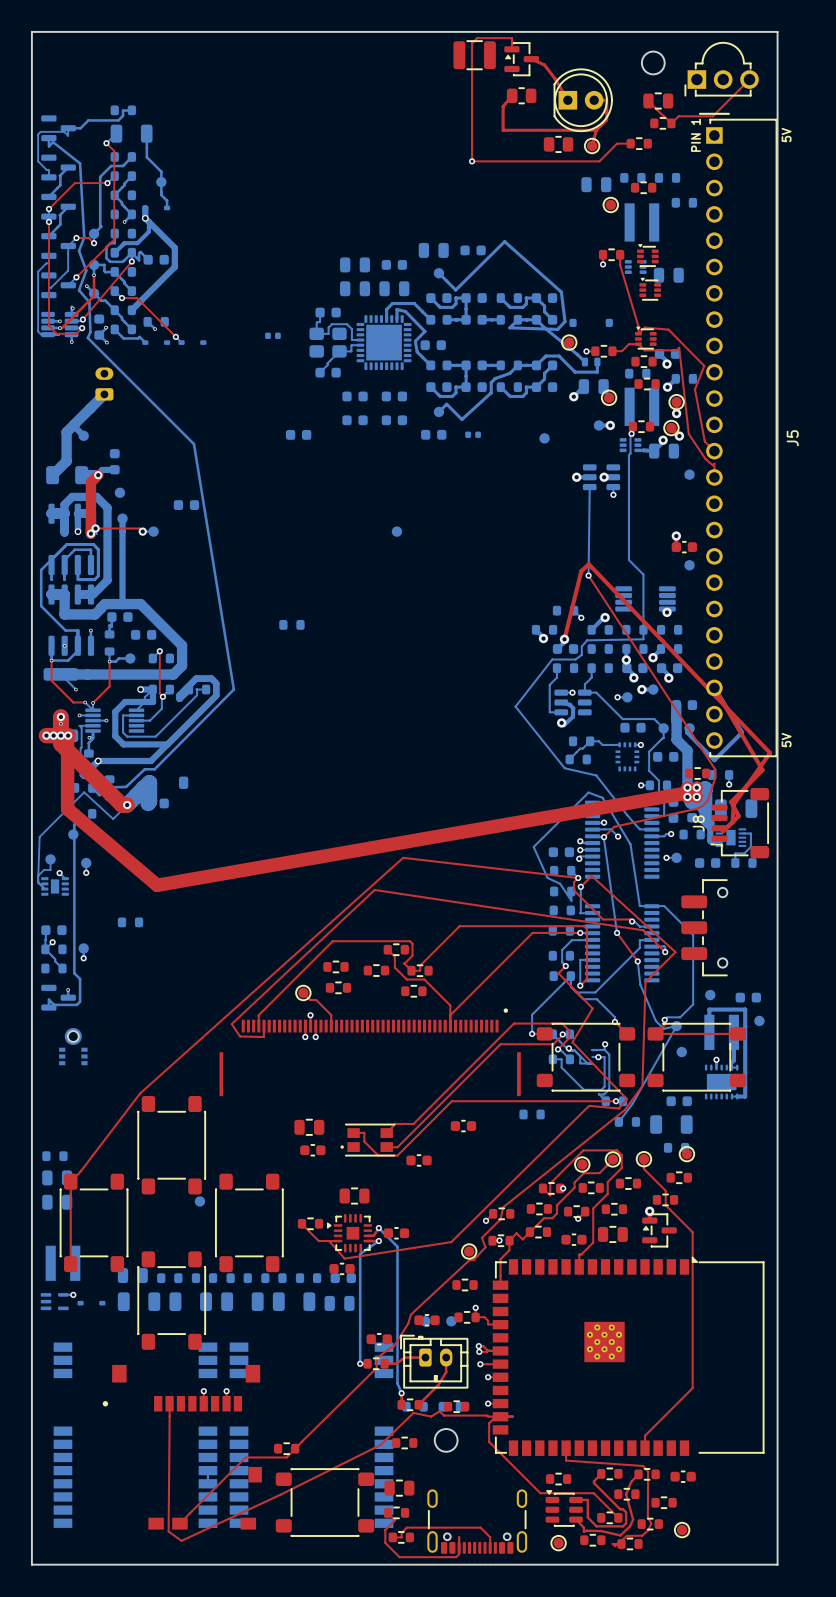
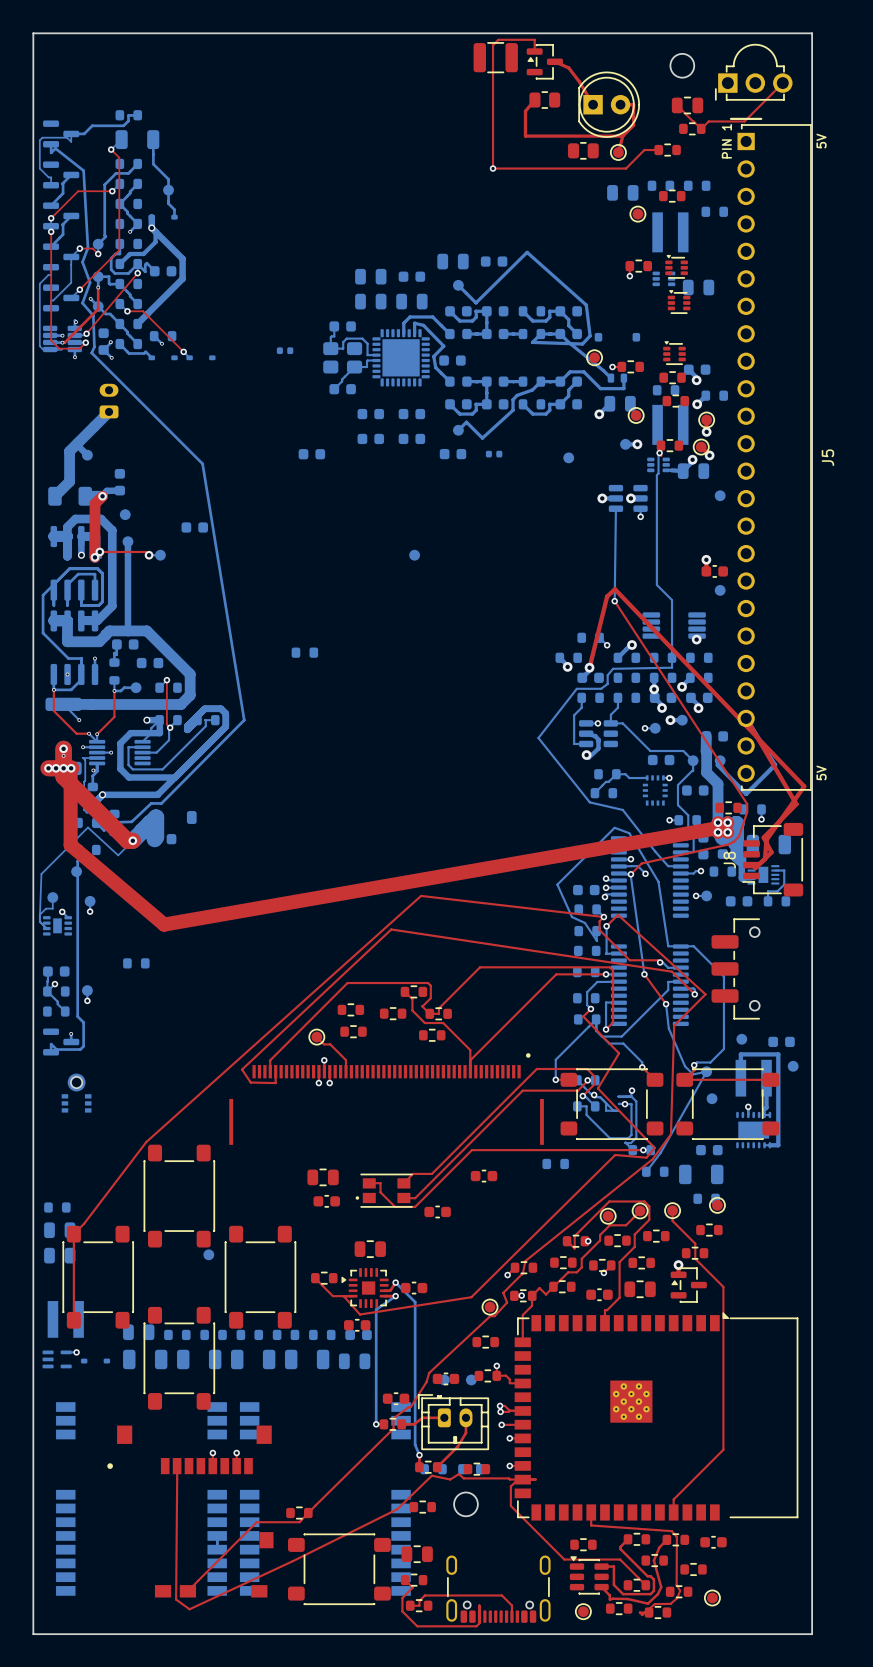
top track: (620, 254) (620, 265) (638, 326) (638, 333) (644, 327) (668, 329) (704, 365) (694, 389) (704, 441) (714, 451) -> none
top track: (612, 351) (621, 351) (628, 344) (638, 344) (644, 350) (676, 350) (679, 347) (688, 434) (705, 459) (712, 465) (714, 463) (714, 477) -> none

